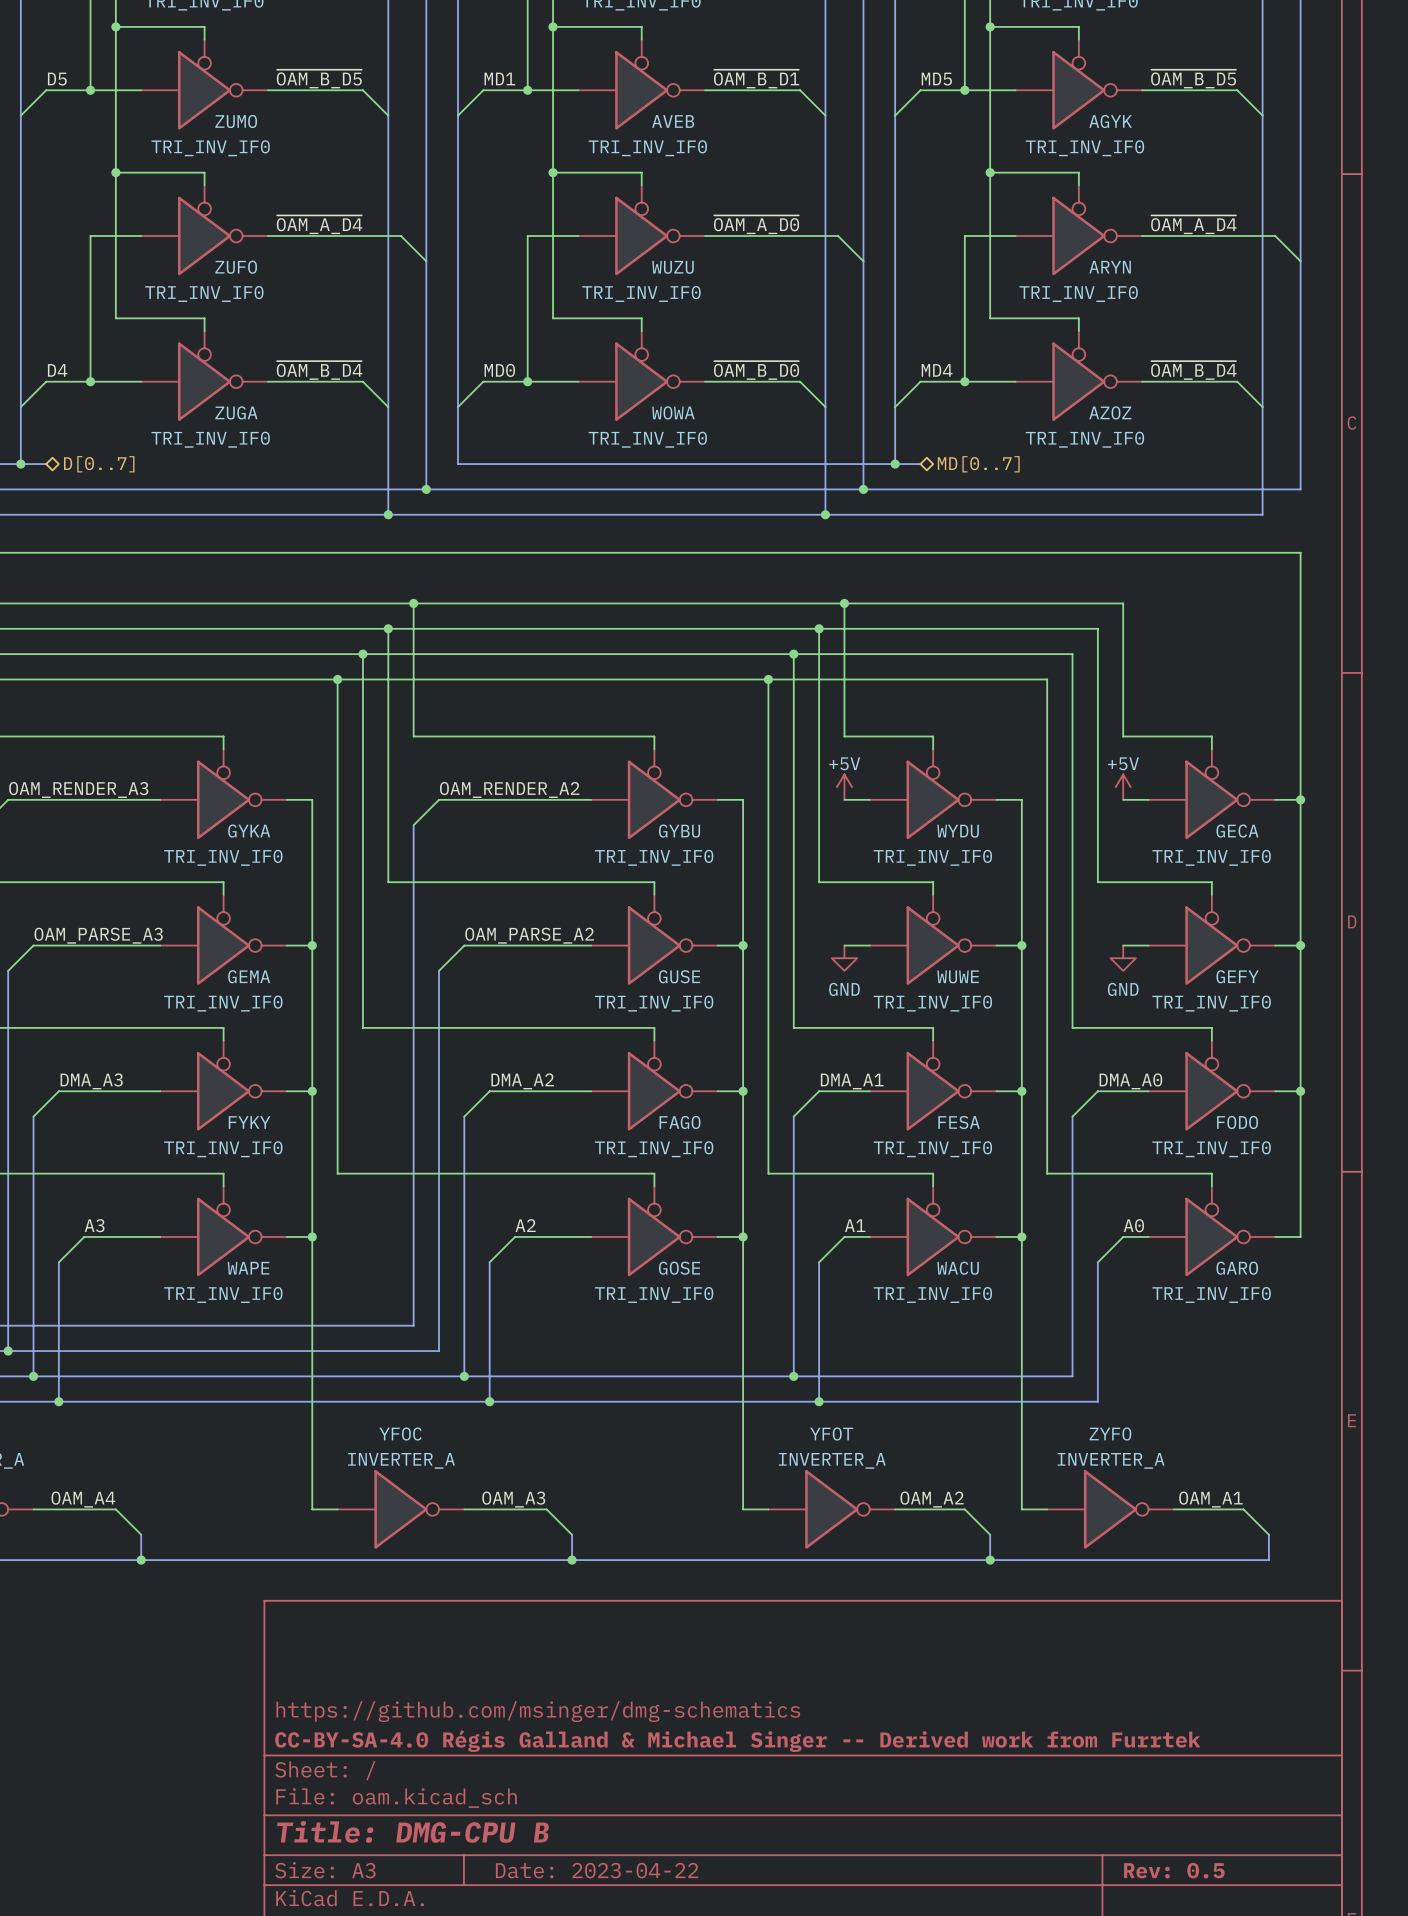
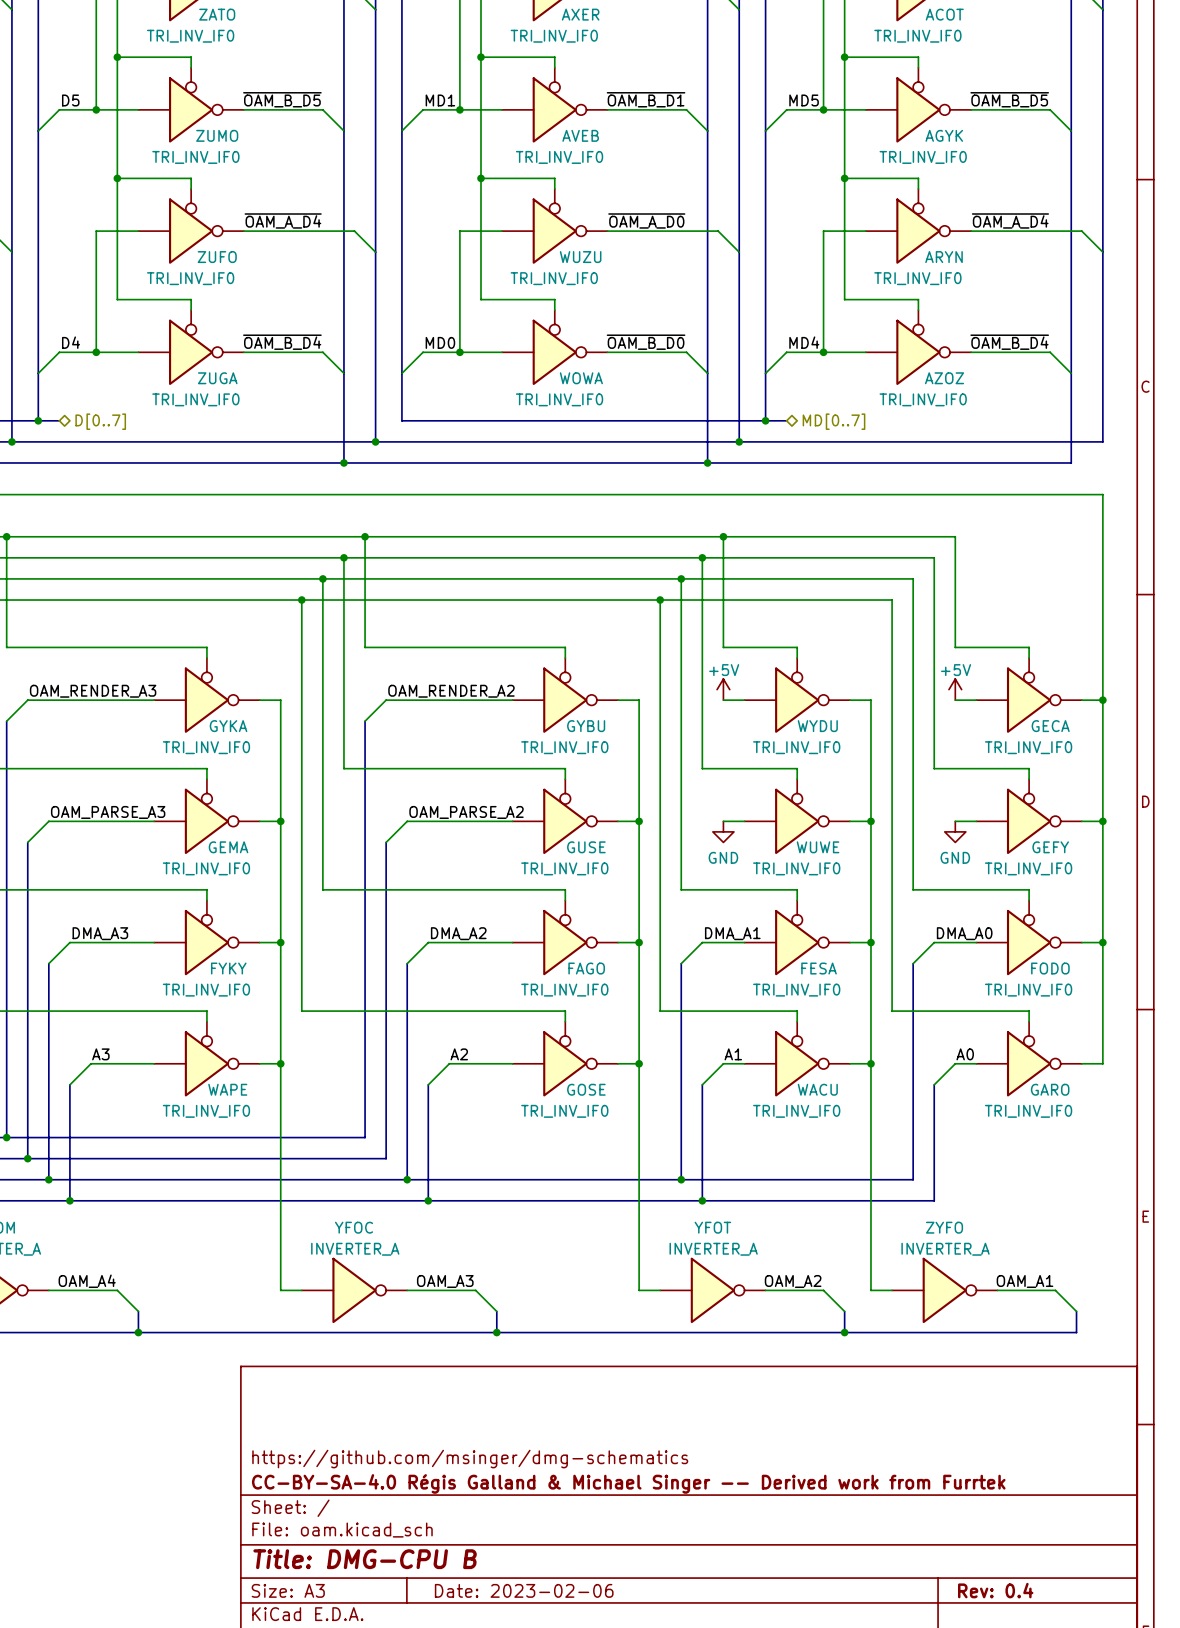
title block: Date: 2023-04-22 (597, 1870) -> Date: 2023-02-06 (524, 1590)
title block: Rev: 0.5 (1174, 1870) -> Rev: 0.4 (995, 1590)

